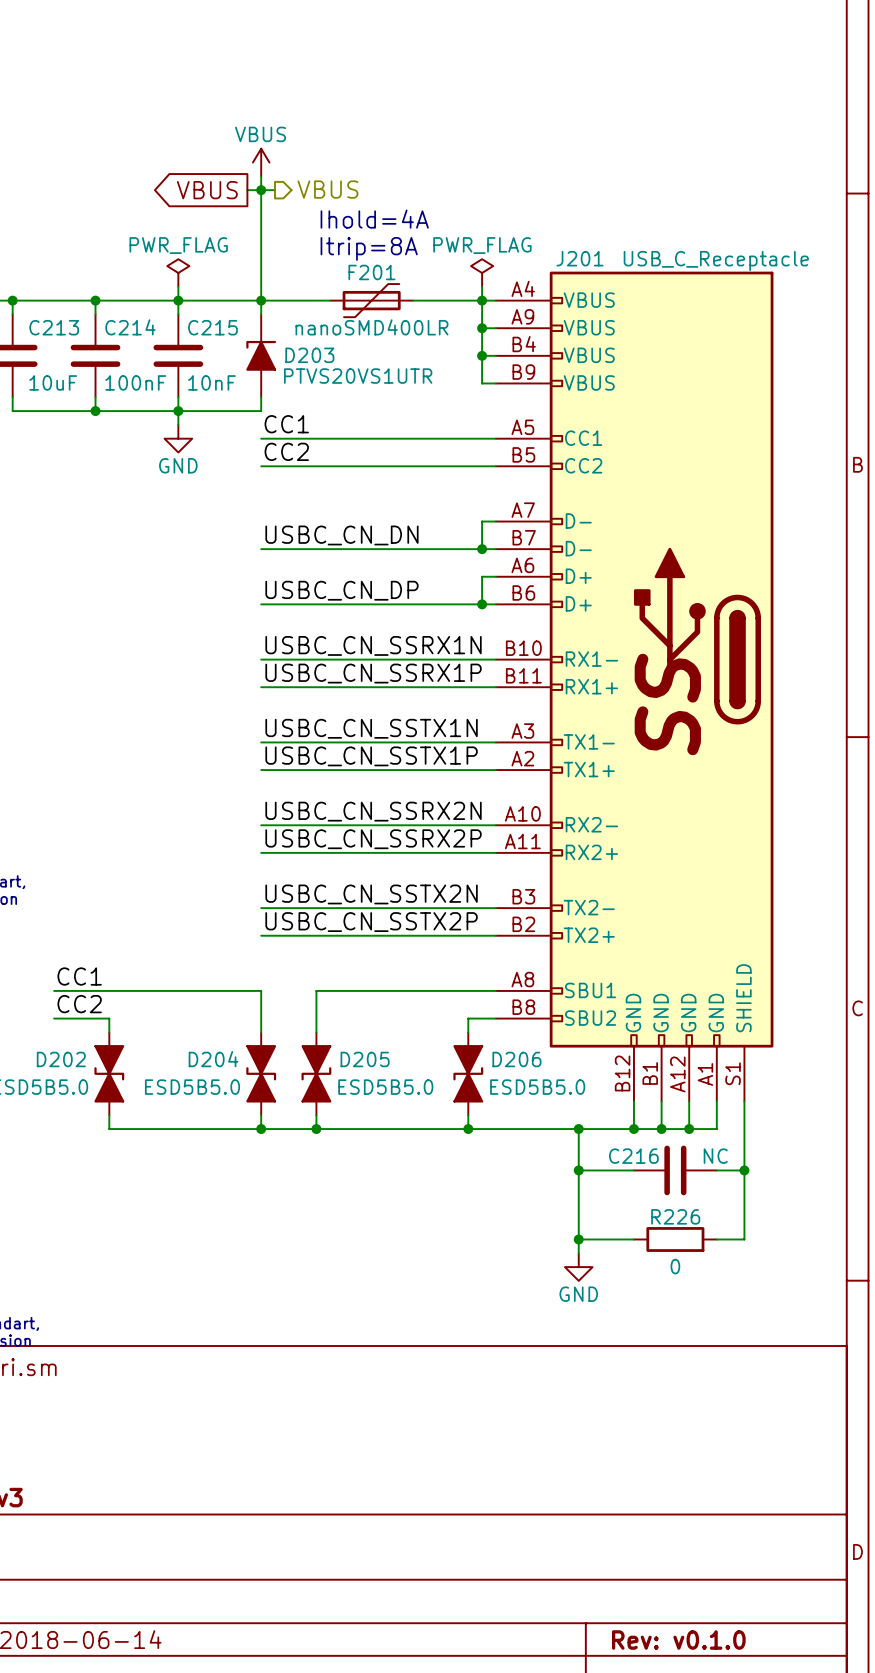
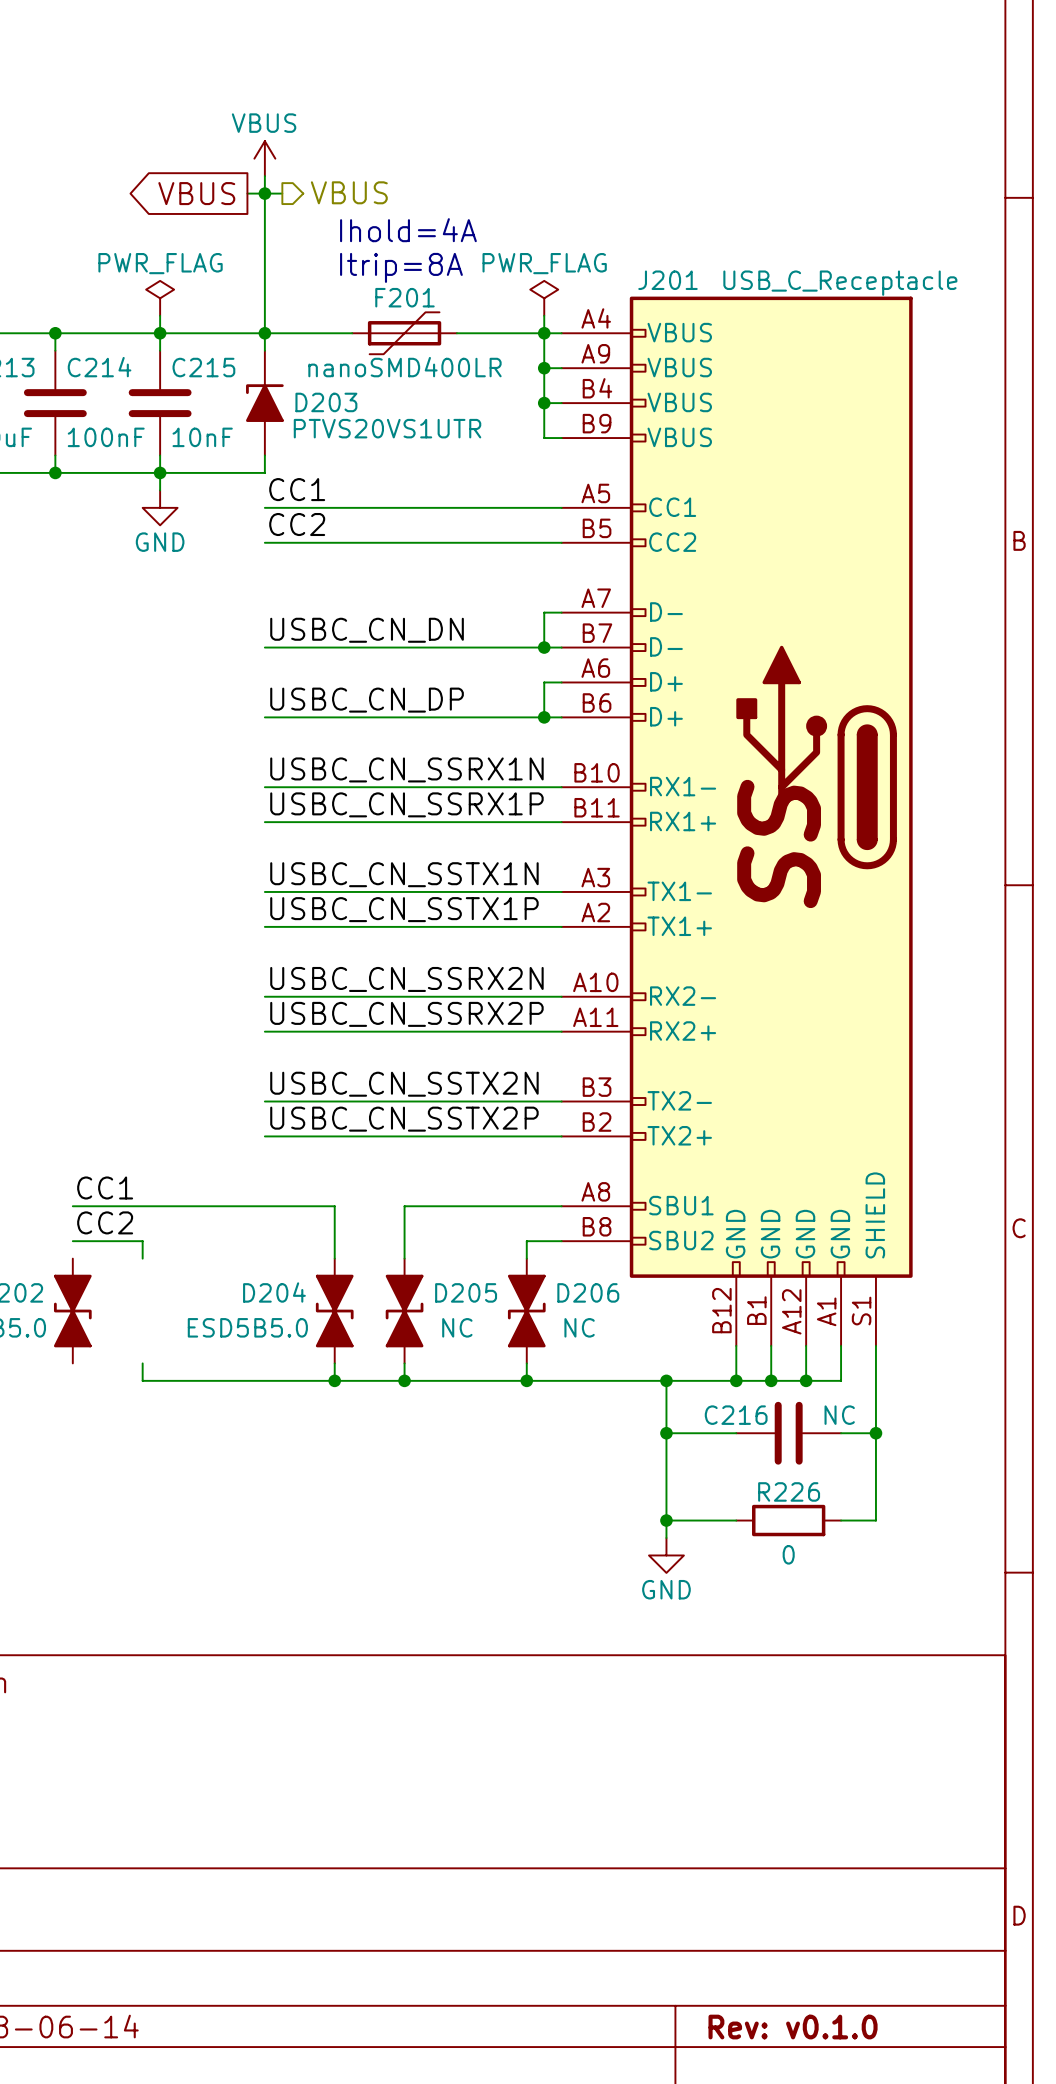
label position: CC1 (79, 976) -> CC1 (105, 1187)
wire: (54, 990) (109, 990) -> none
wire: (261, 990) (261, 1032) -> (264, 1206) (334, 1206)
wire: (316, 990) (371, 990) -> (404, 1258) (404, 1206)
label position: CC2 (79, 1004) -> CC2 (105, 1222)
wire: (54, 1018) (109, 1018) (109, 1032) -> (72, 1241) (142, 1241) (142, 1258)
D204 position: (261, 1073) -> (334, 1311)
D205 position: (316, 1073) -> (404, 1311)
D205 value: ESD5B5.0 (385, 1087) -> NC (457, 1327)
D206 value: ESD5B5.0 (537, 1087) -> NC (579, 1327)
wire: (109, 1115) (109, 1129) (164, 1129) -> (142, 1363) (142, 1380)
wire: (261, 1115) (261, 1129) -> (404, 1363) (404, 1380)
junction: (261, 1129) -> none
junction: none -> (404, 1380)

